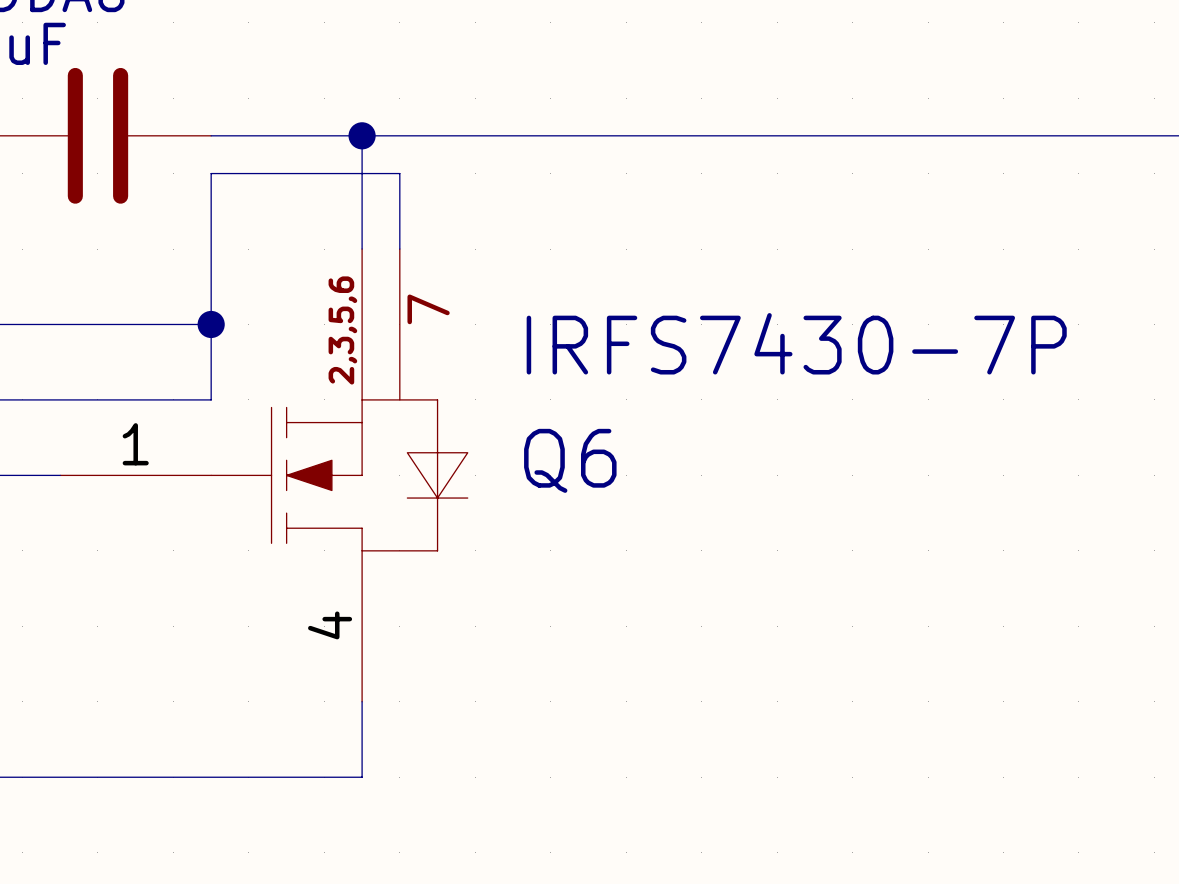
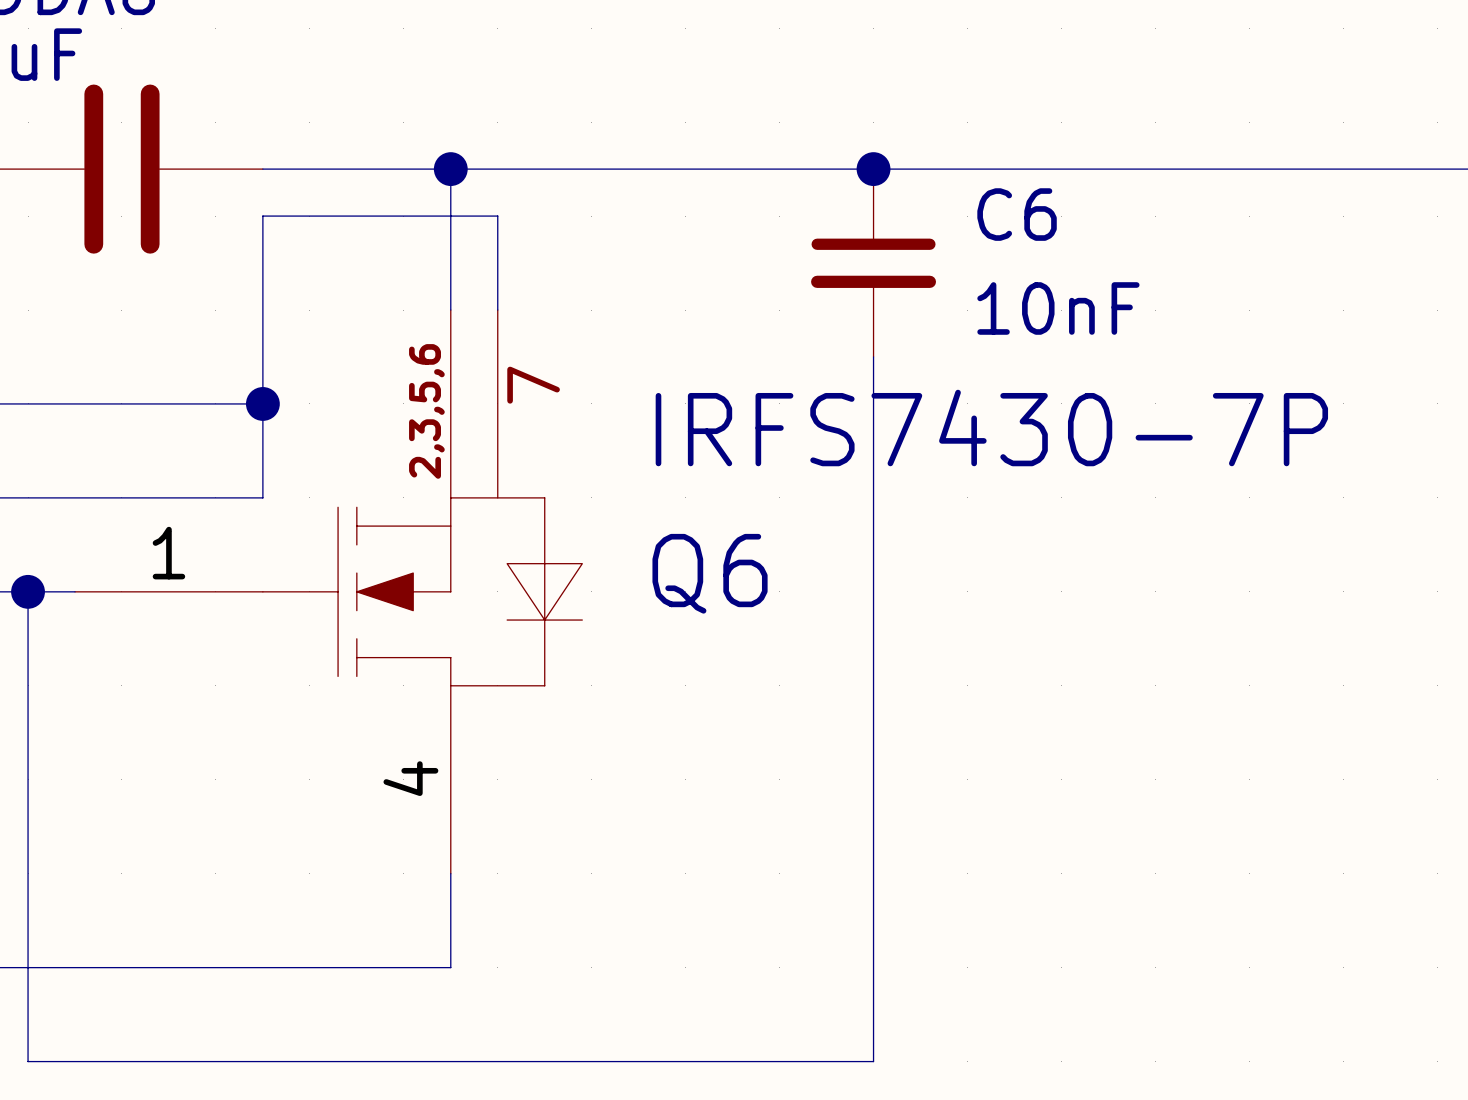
junction: none -> (873, 169)
C6: none -> 10nF (873, 263)
wire: none -> (873, 356) (873, 1061) (28, 1061) (28, 591)
junction: none -> (28, 591)

